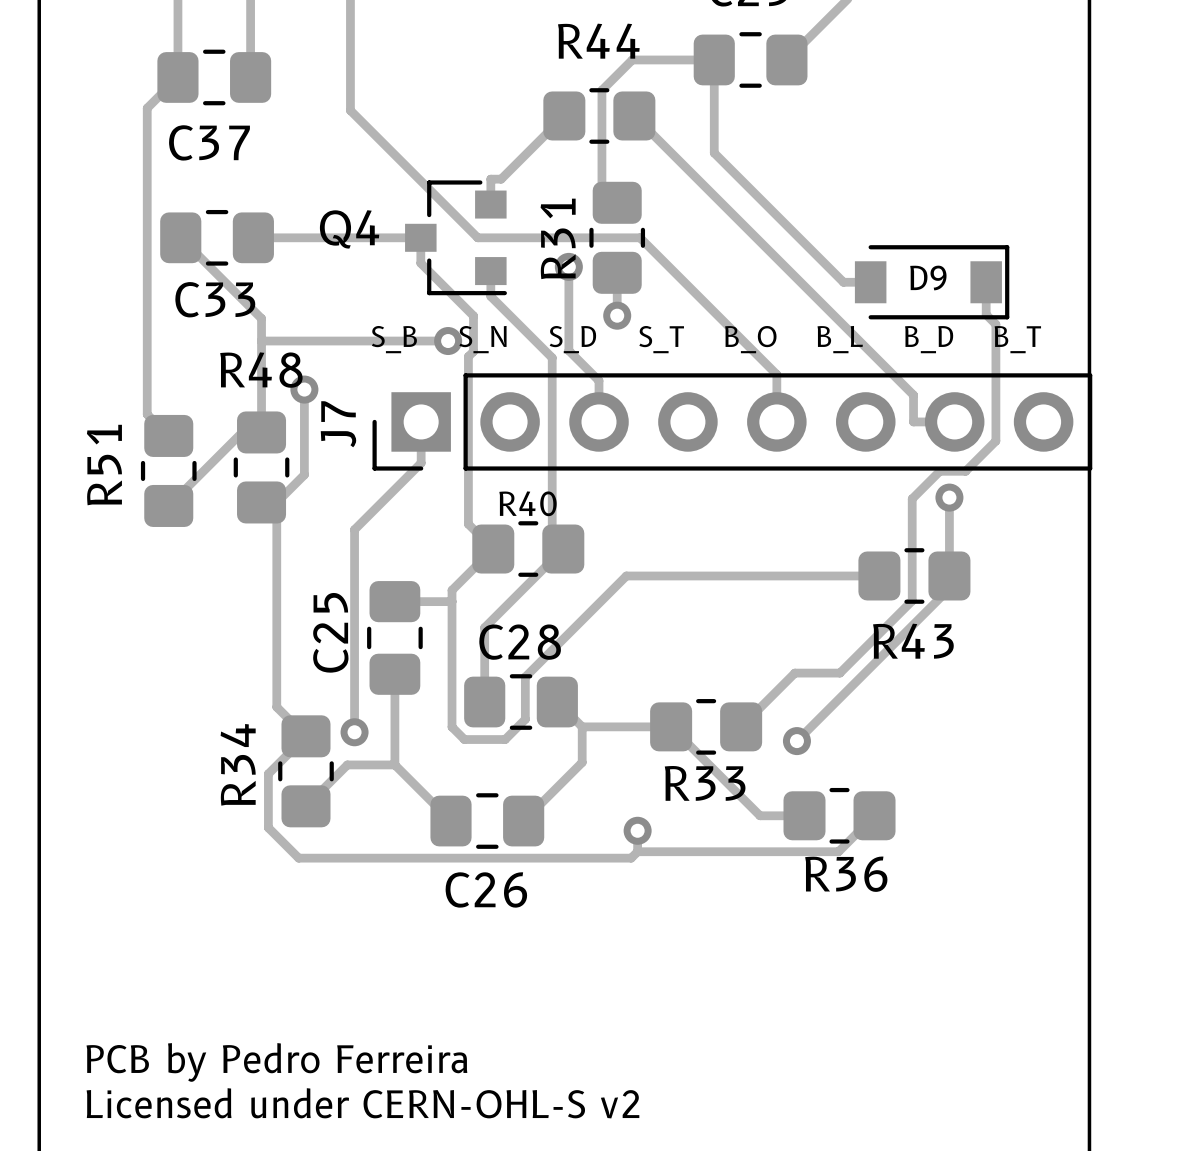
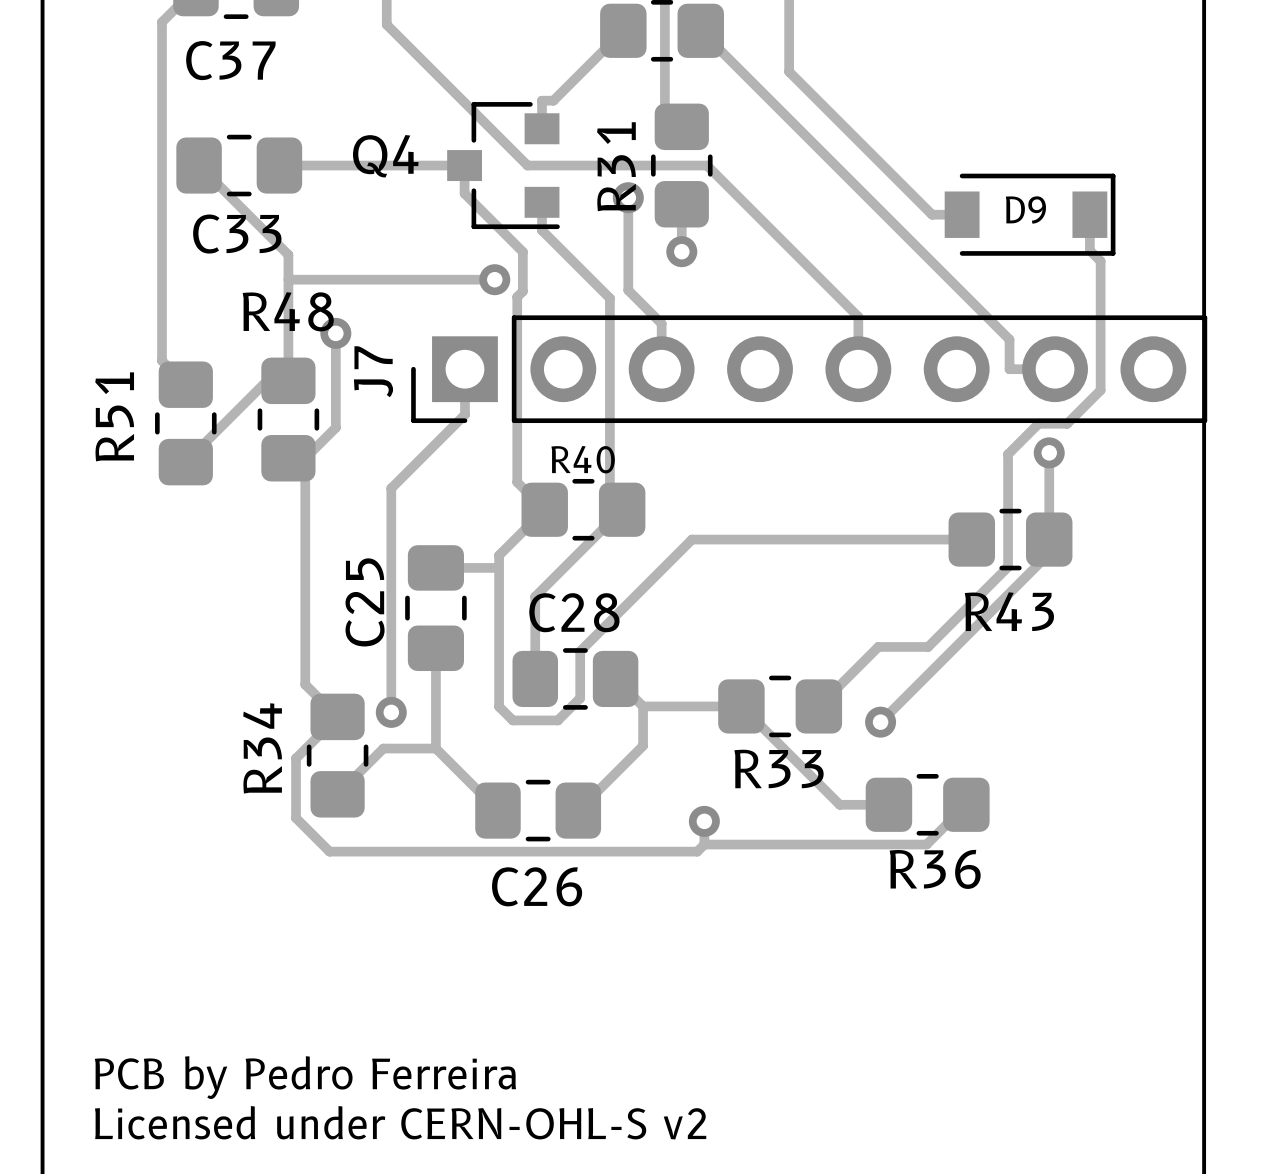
text: S_B (394, 339) -> none
text: S_N (482, 339) -> none
text: S_D (572, 339) -> none
text: S_T (661, 339) -> none
text: B_O (750, 339) -> none
text: B_L (840, 339) -> none
text: B_D (929, 339) -> none
text: B_T (1017, 339) -> none

